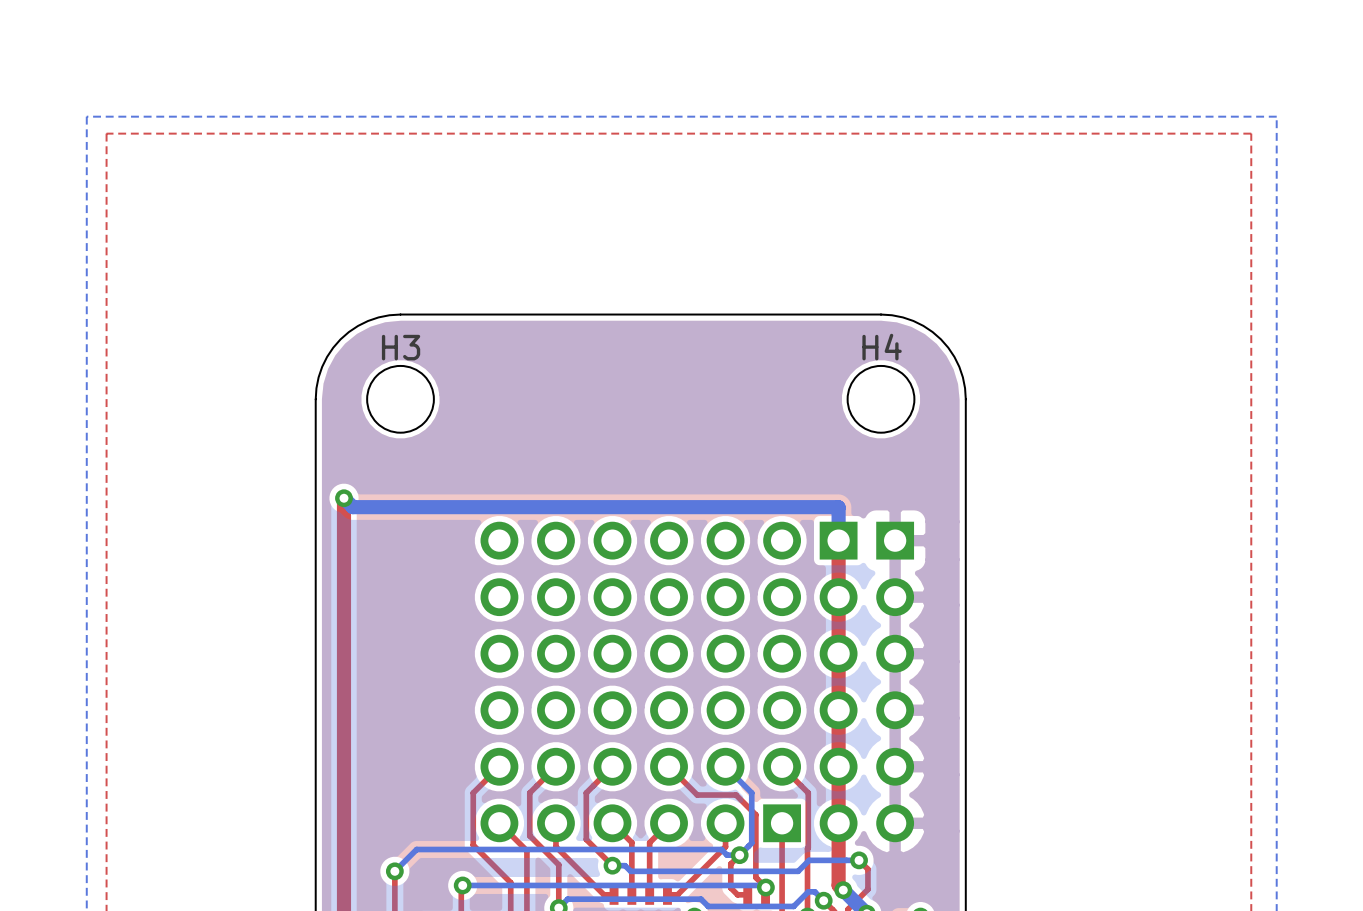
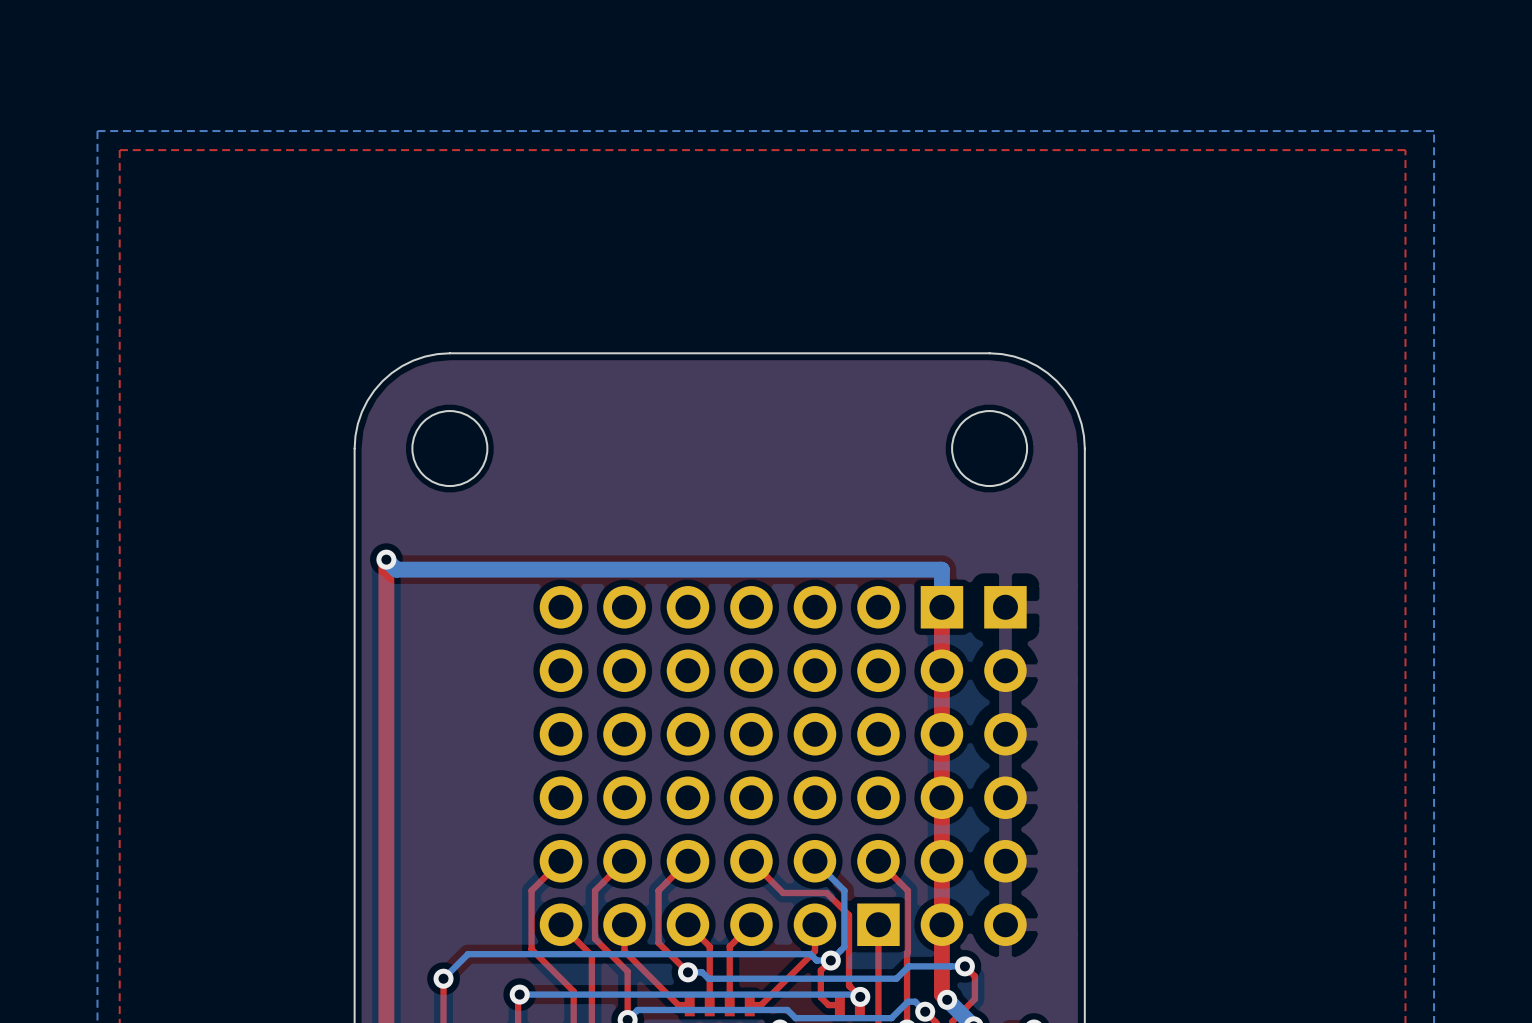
H3 name: H3 (401, 347) -> none
H4 name: H4 (882, 347) -> none

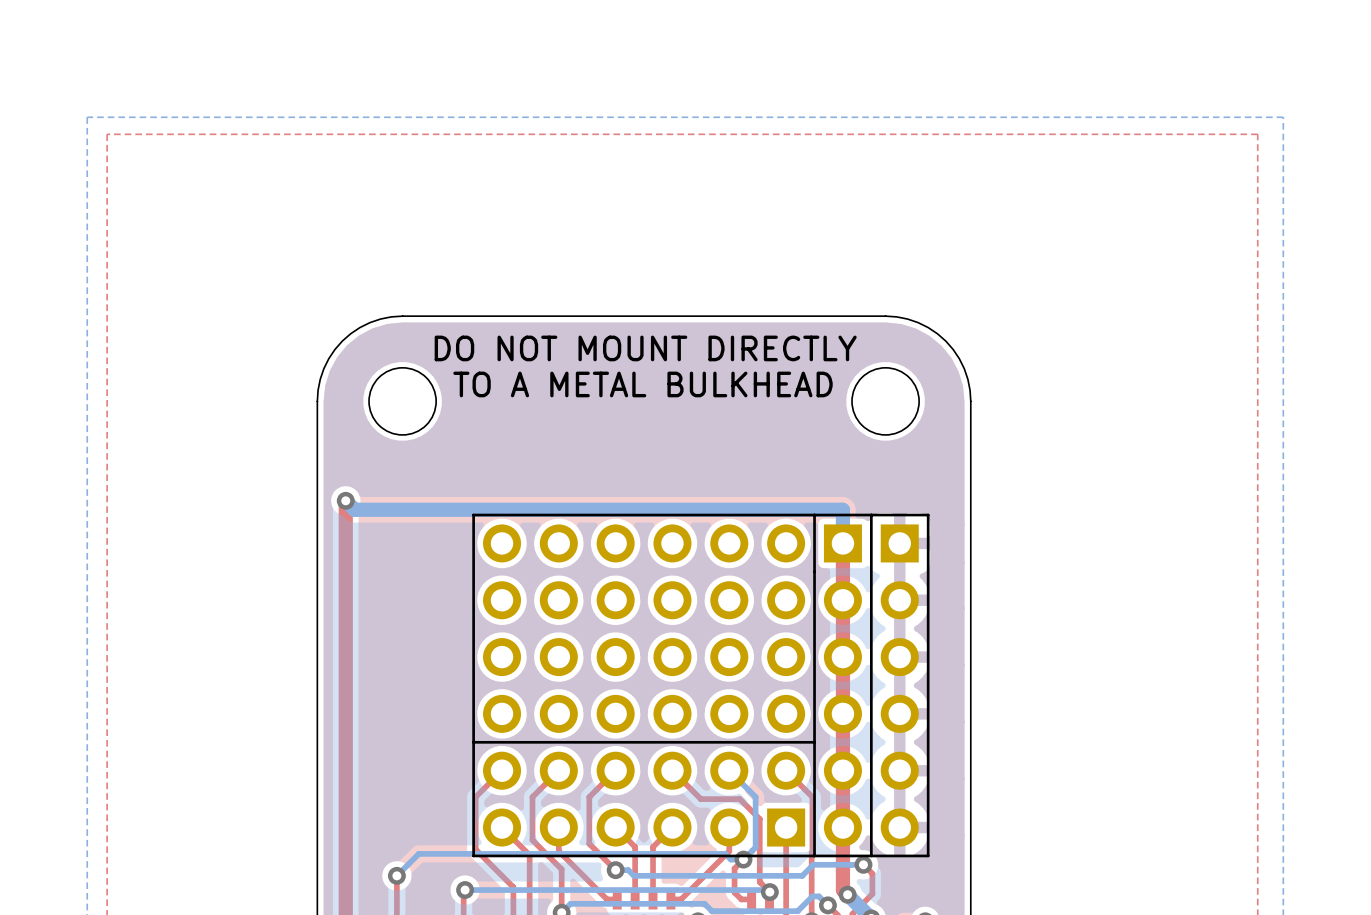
text: none -> DO NOT MOUNT DIRECTLY (645, 348)
text: none -> TO A METAL BULKHEAD (643, 384)
line: none -> (814, 515) (814, 855)
line: none -> (871, 515) (871, 855)
line: none -> (928, 515) (473, 515) (473, 855) (928, 855) (928, 515)
line: none -> (814, 742) (473, 742)

